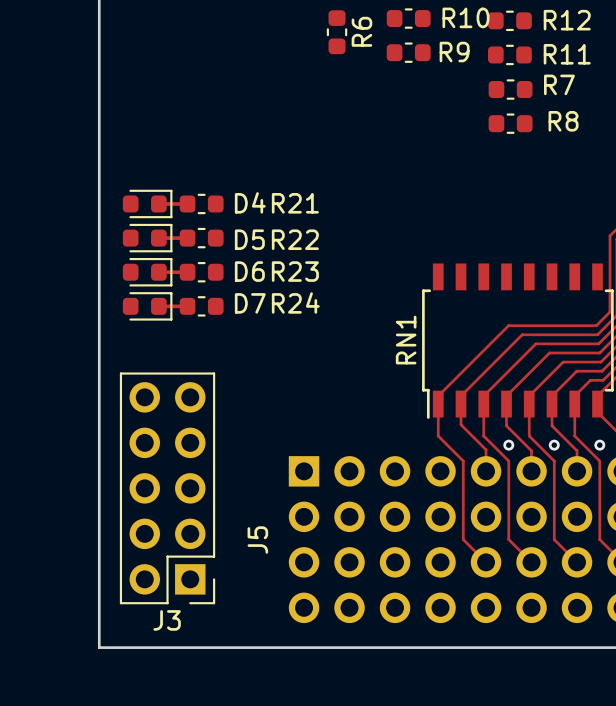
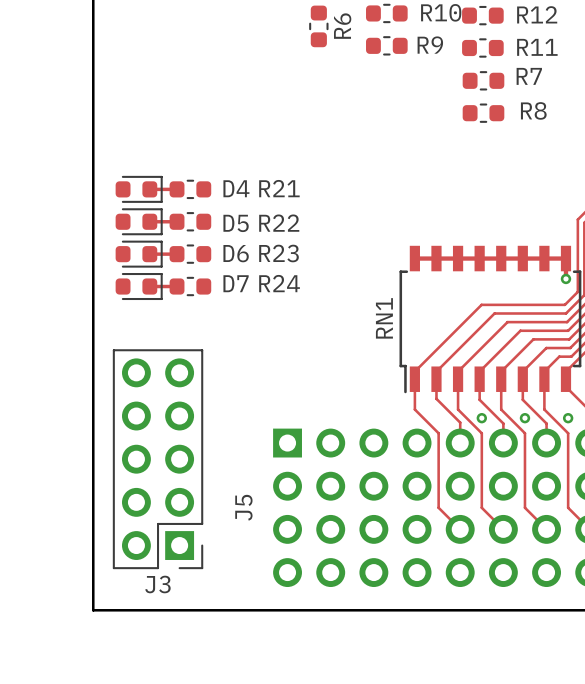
track: none -> (414, 258) (565, 258) (565, 278)
via: none -> (565, 278)

